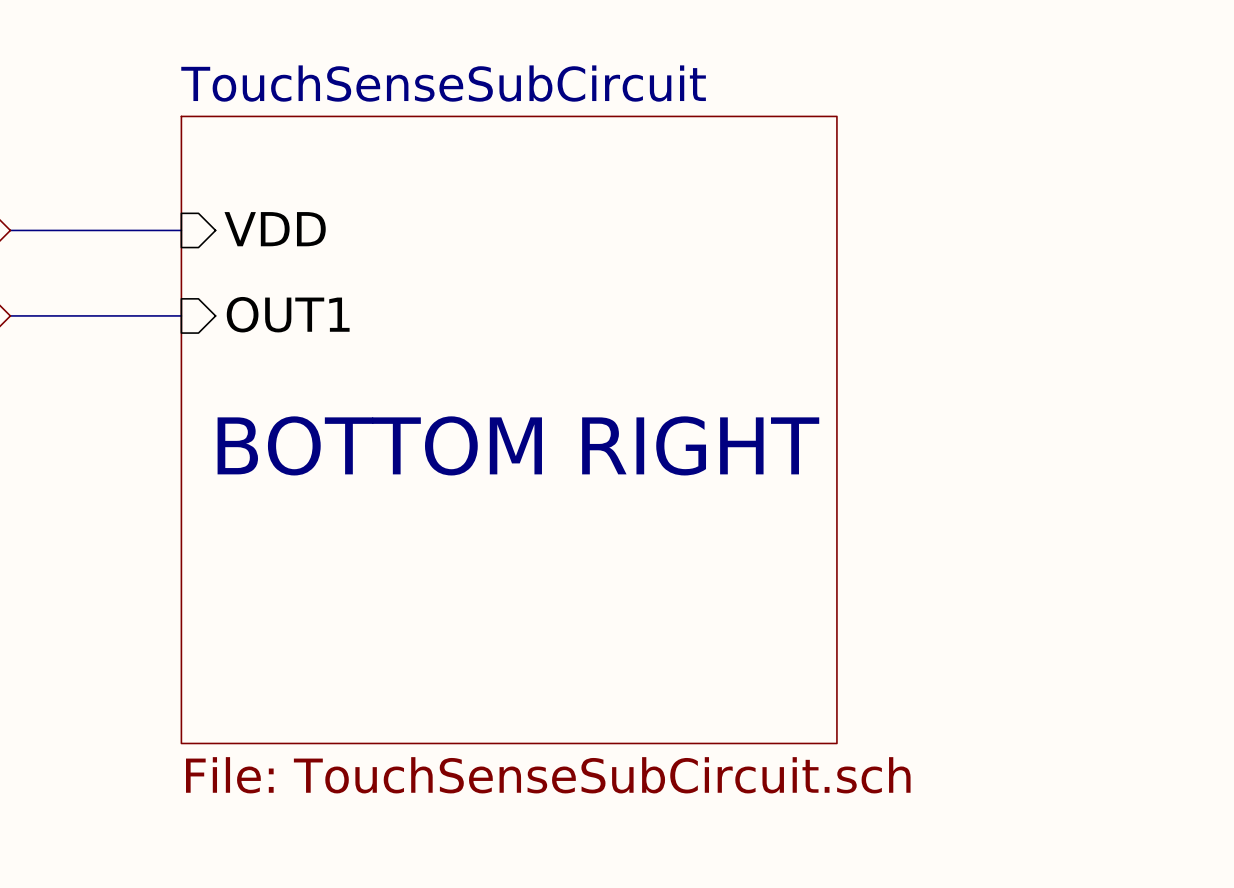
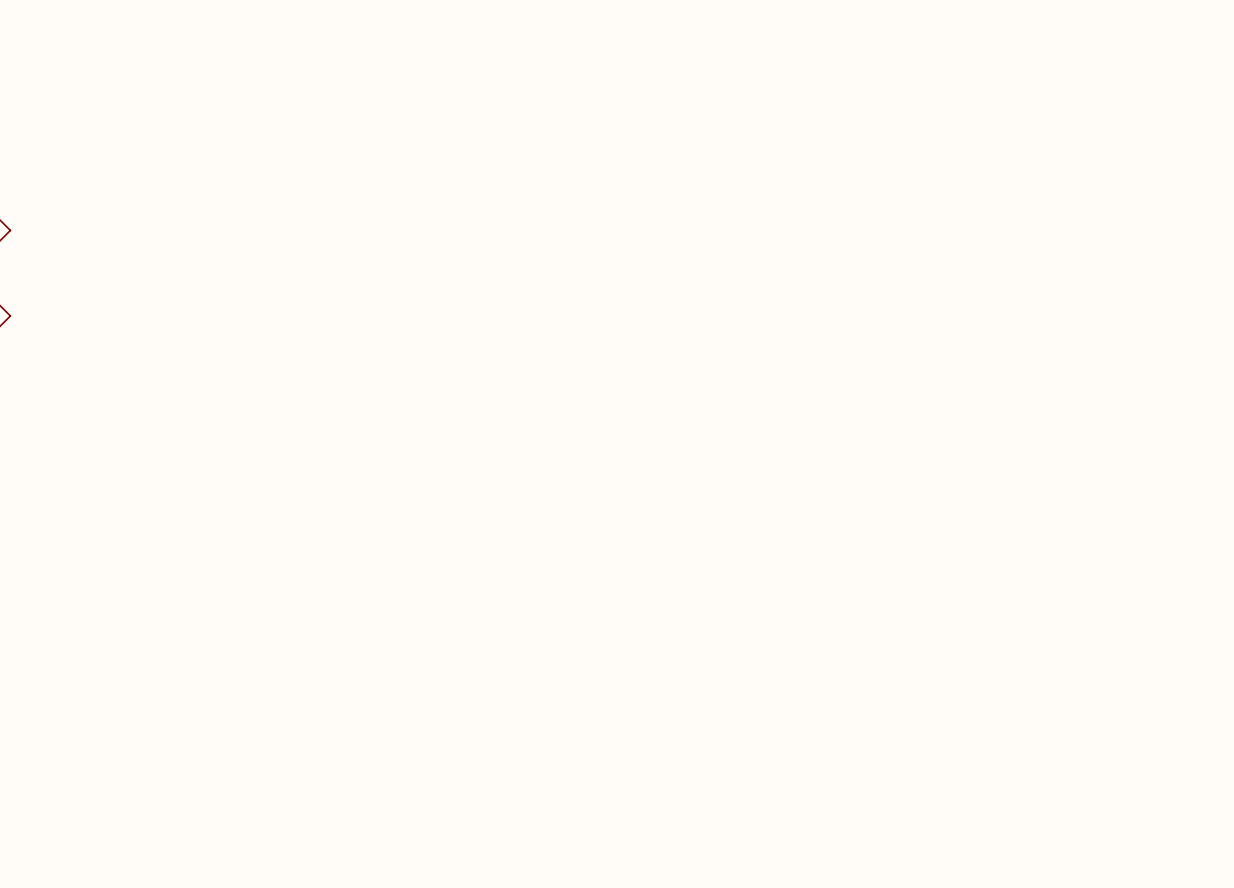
sheet pin: VDD (275, 229) -> none
wire: (10, 230) (181, 230) -> none
sheet pin: OUT1 (288, 314) -> none
wire: (10, 315) (181, 315) -> none
sheet TouchSenseSubCircuit: File: TouchSenseSubCircuit.sch (509, 429) -> none
text: BOTTOM RIGHT (518, 445) -> none

